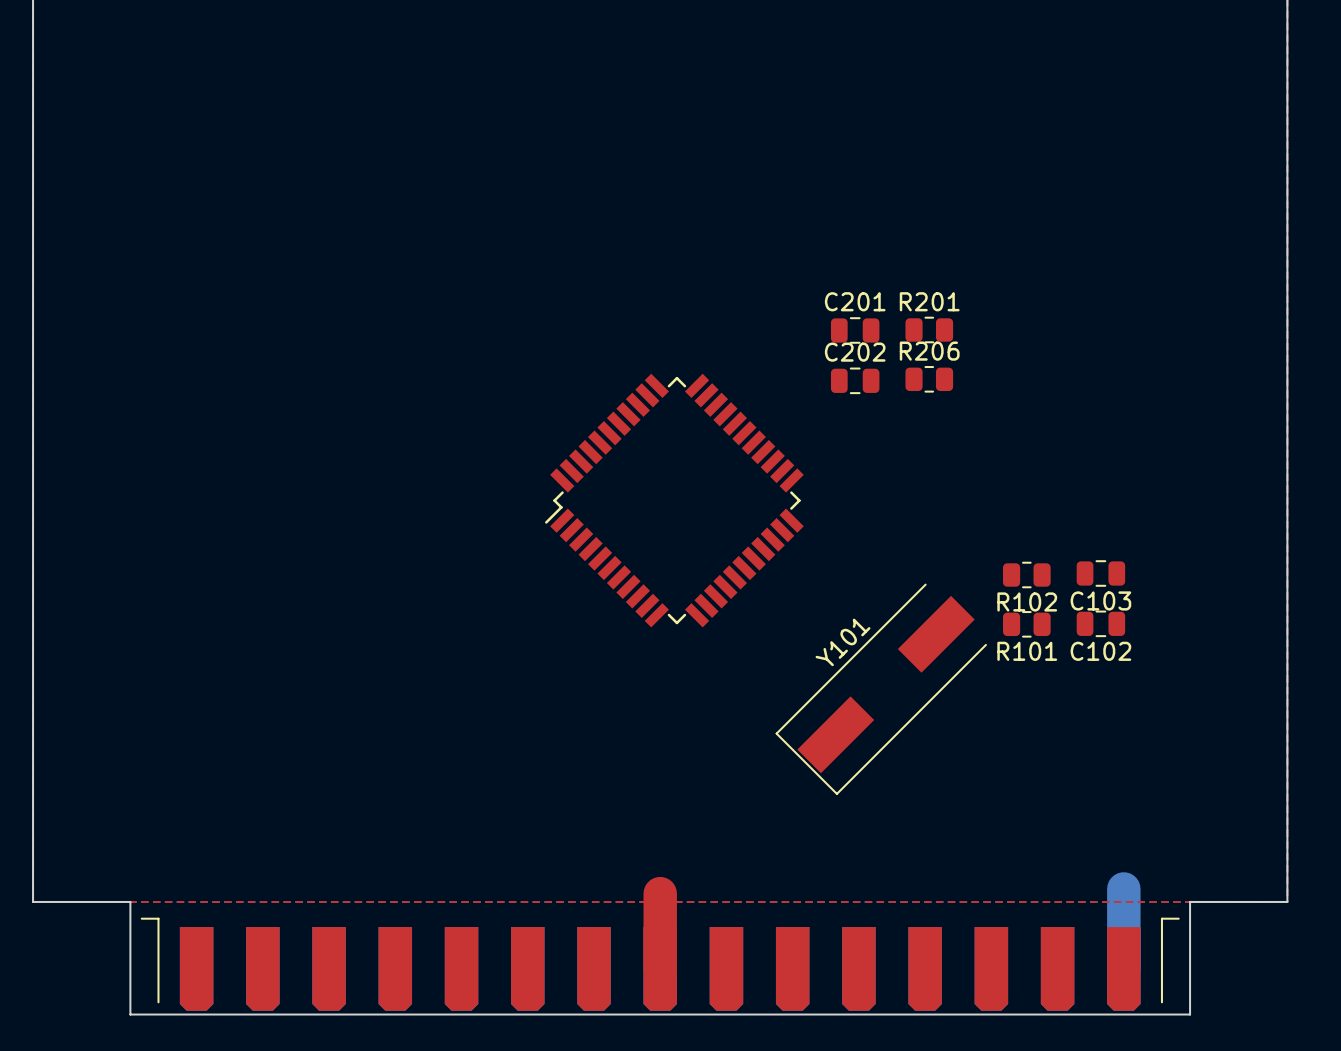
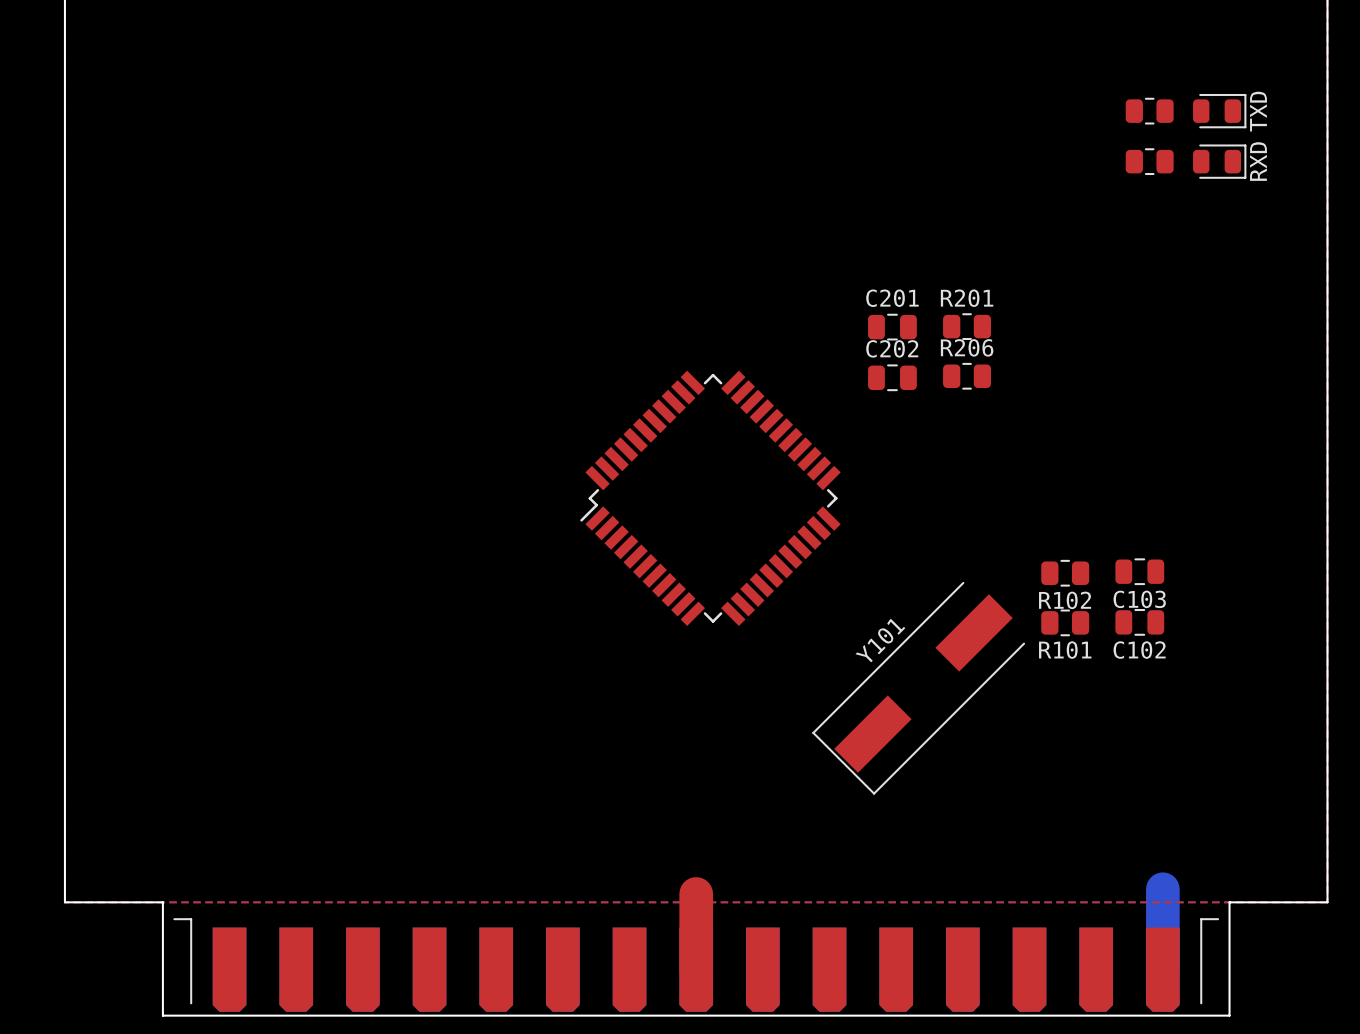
part: none -> (1149, 111)
part: none -> TXD (1219, 111)
part: none -> (1149, 161)
part: none -> RXD (1219, 161)

